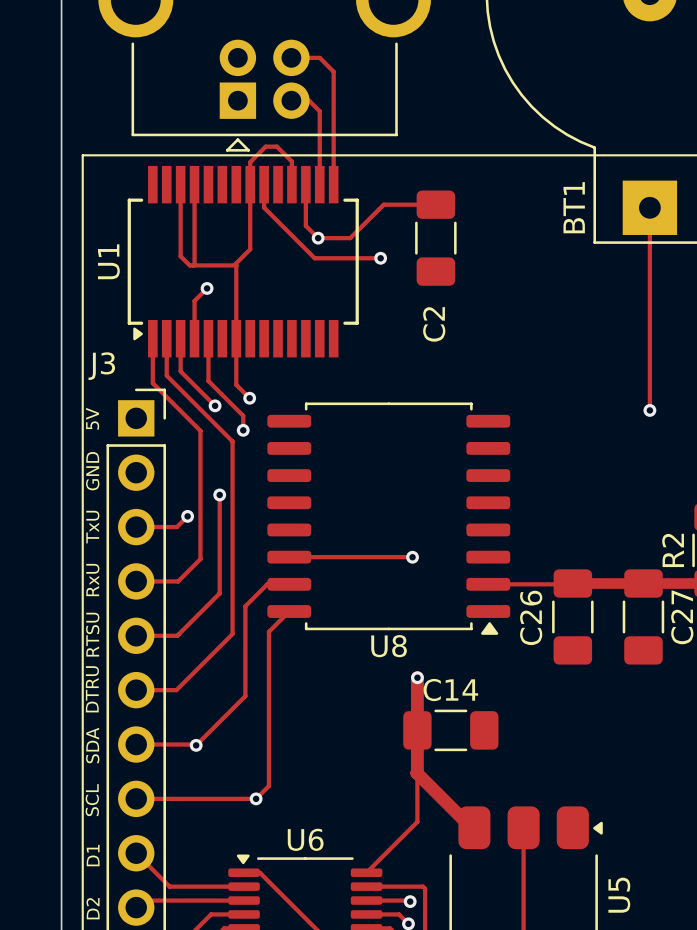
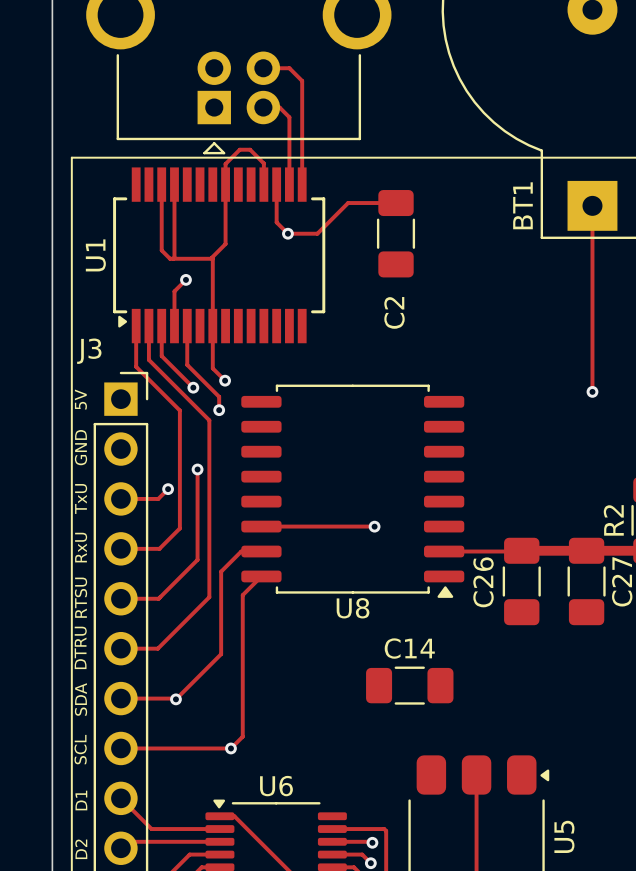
track: (264, 184) (264, 207) (314, 258) (380, 258) -> none
via: (380, 258) -> none
track: (417, 677) (416, 772) (471, 827) (474, 827) -> none
via: (417, 677) -> none
track: (417, 730) (417, 821) (366, 872) -> none

